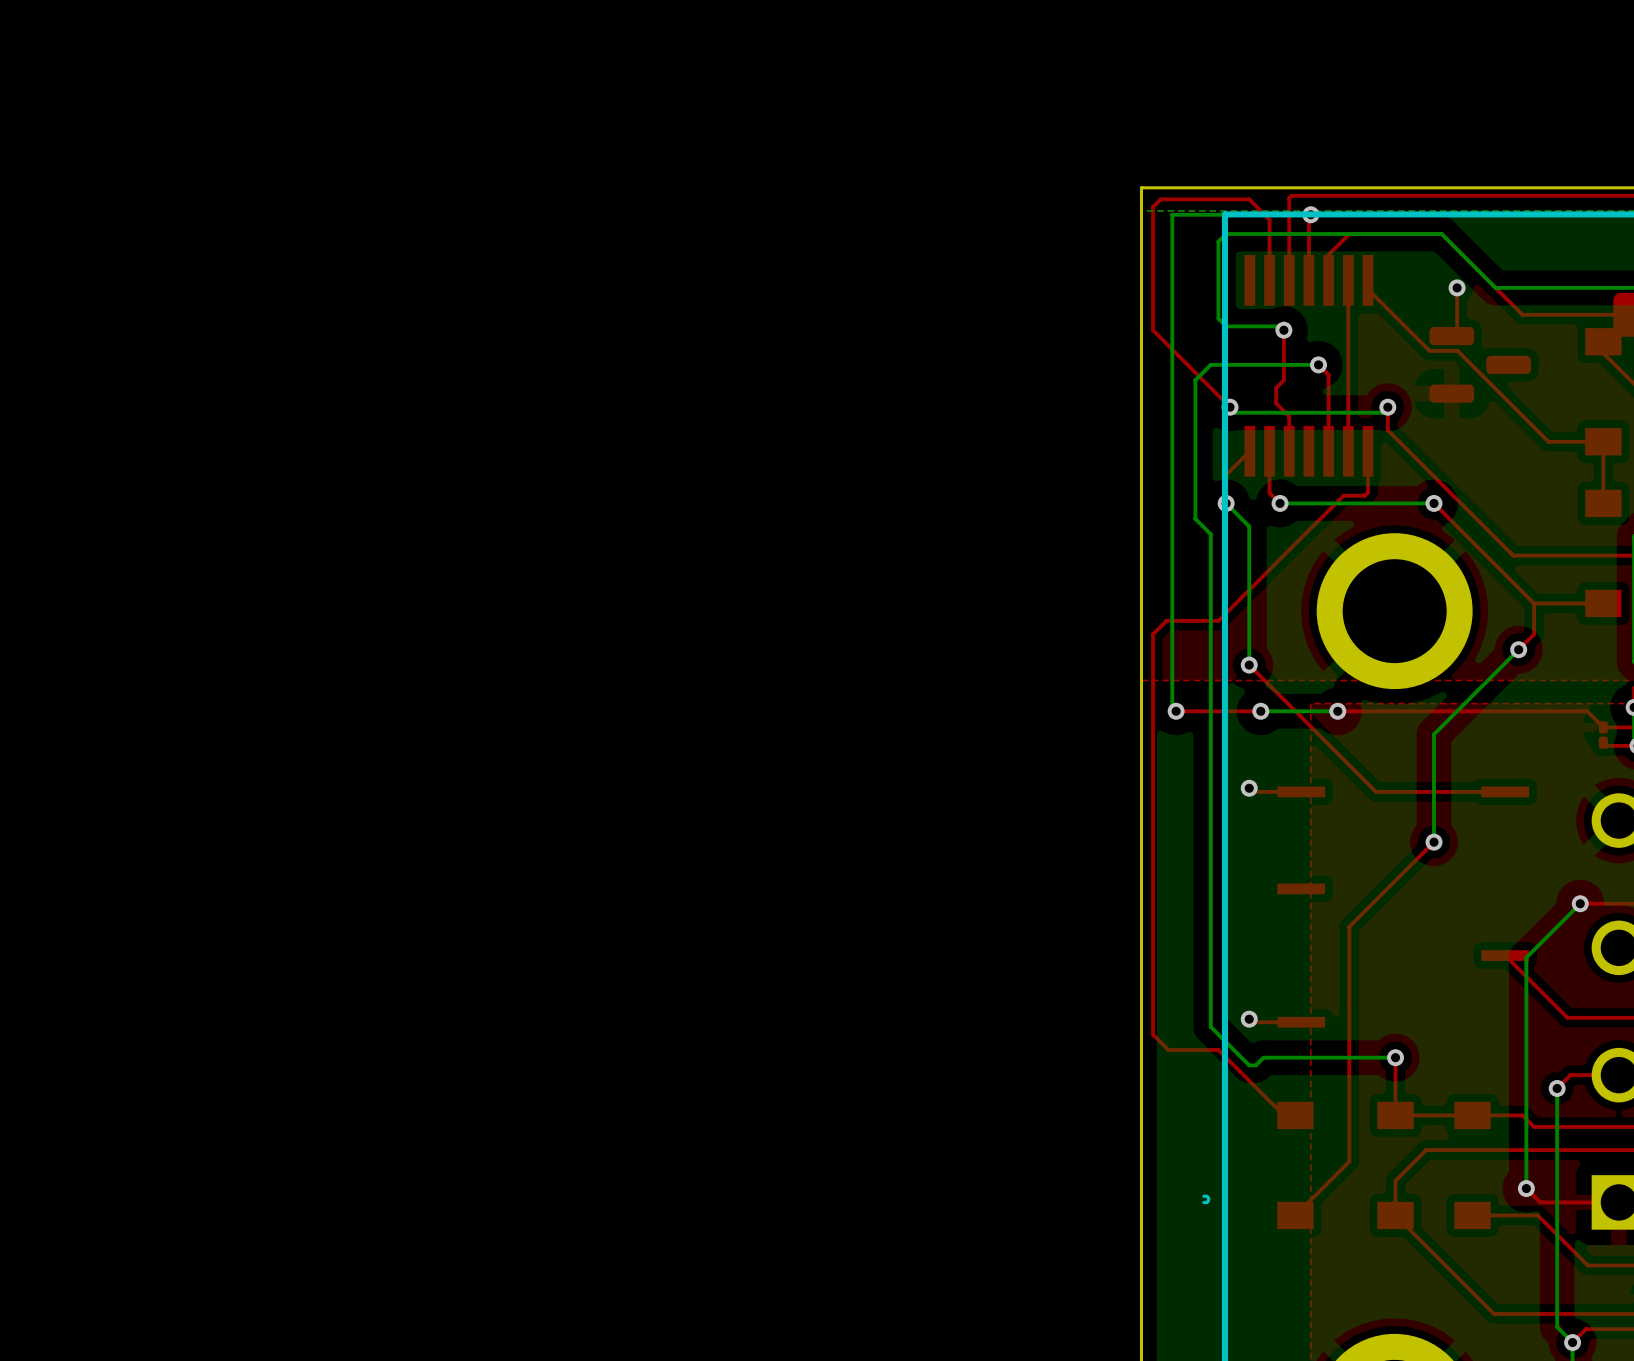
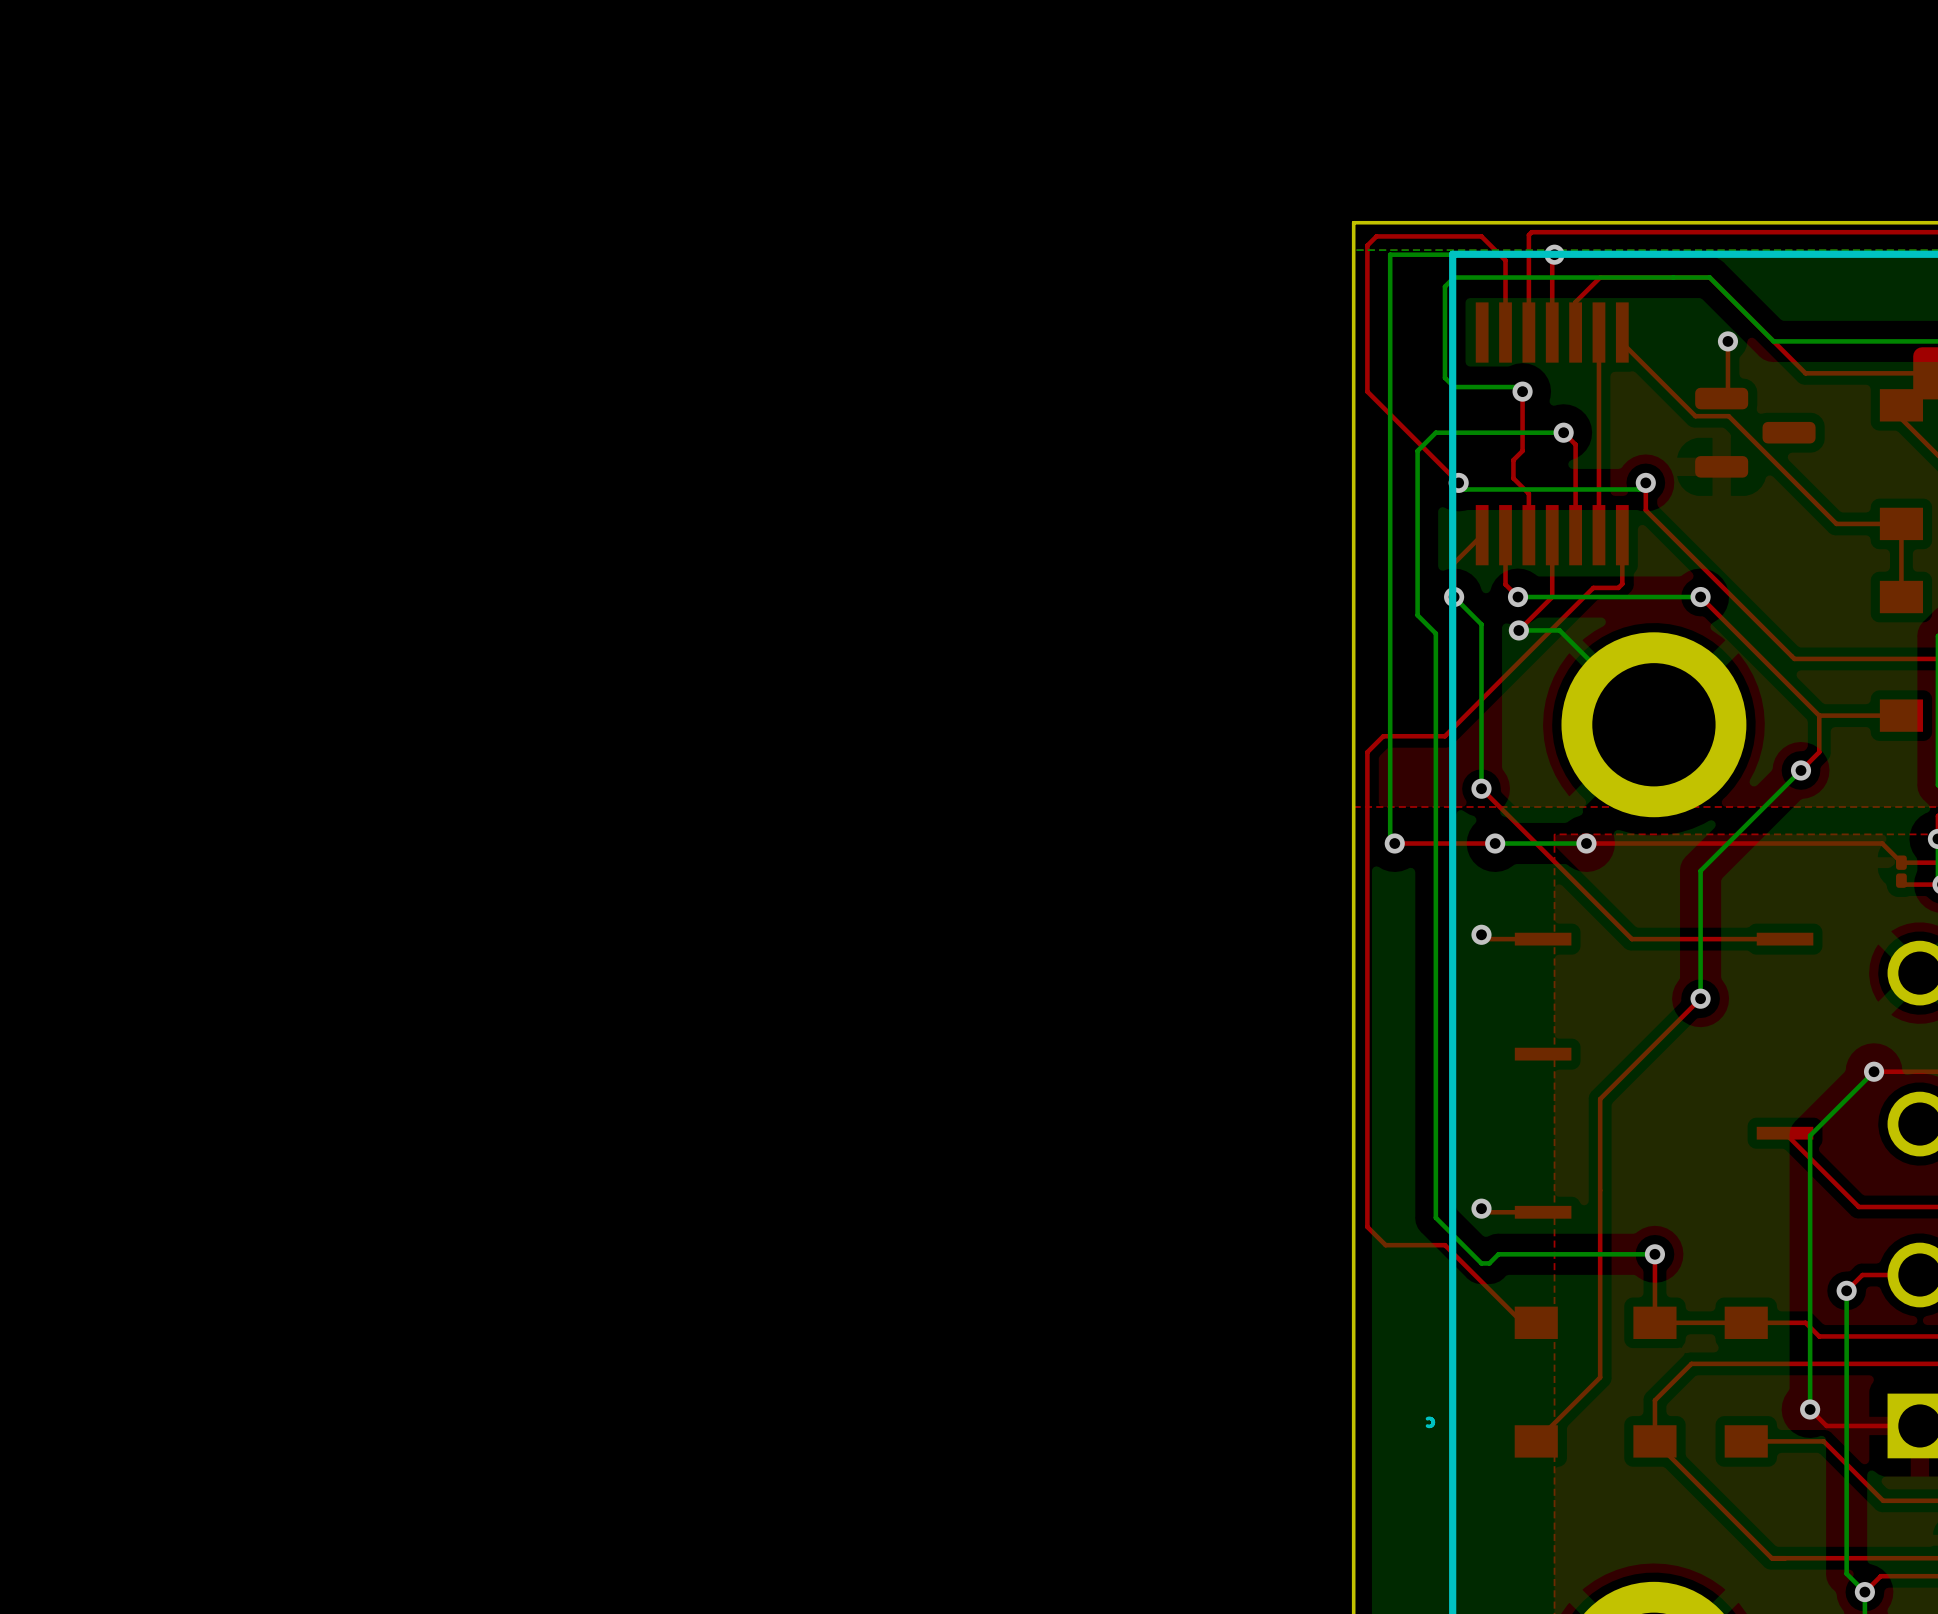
top track: none -> (1552, 535) (1552, 597) (1518, 630)
bottom track: none -> (1518, 630) (1559, 630) (1653, 724)
via: none -> (1518, 630)

